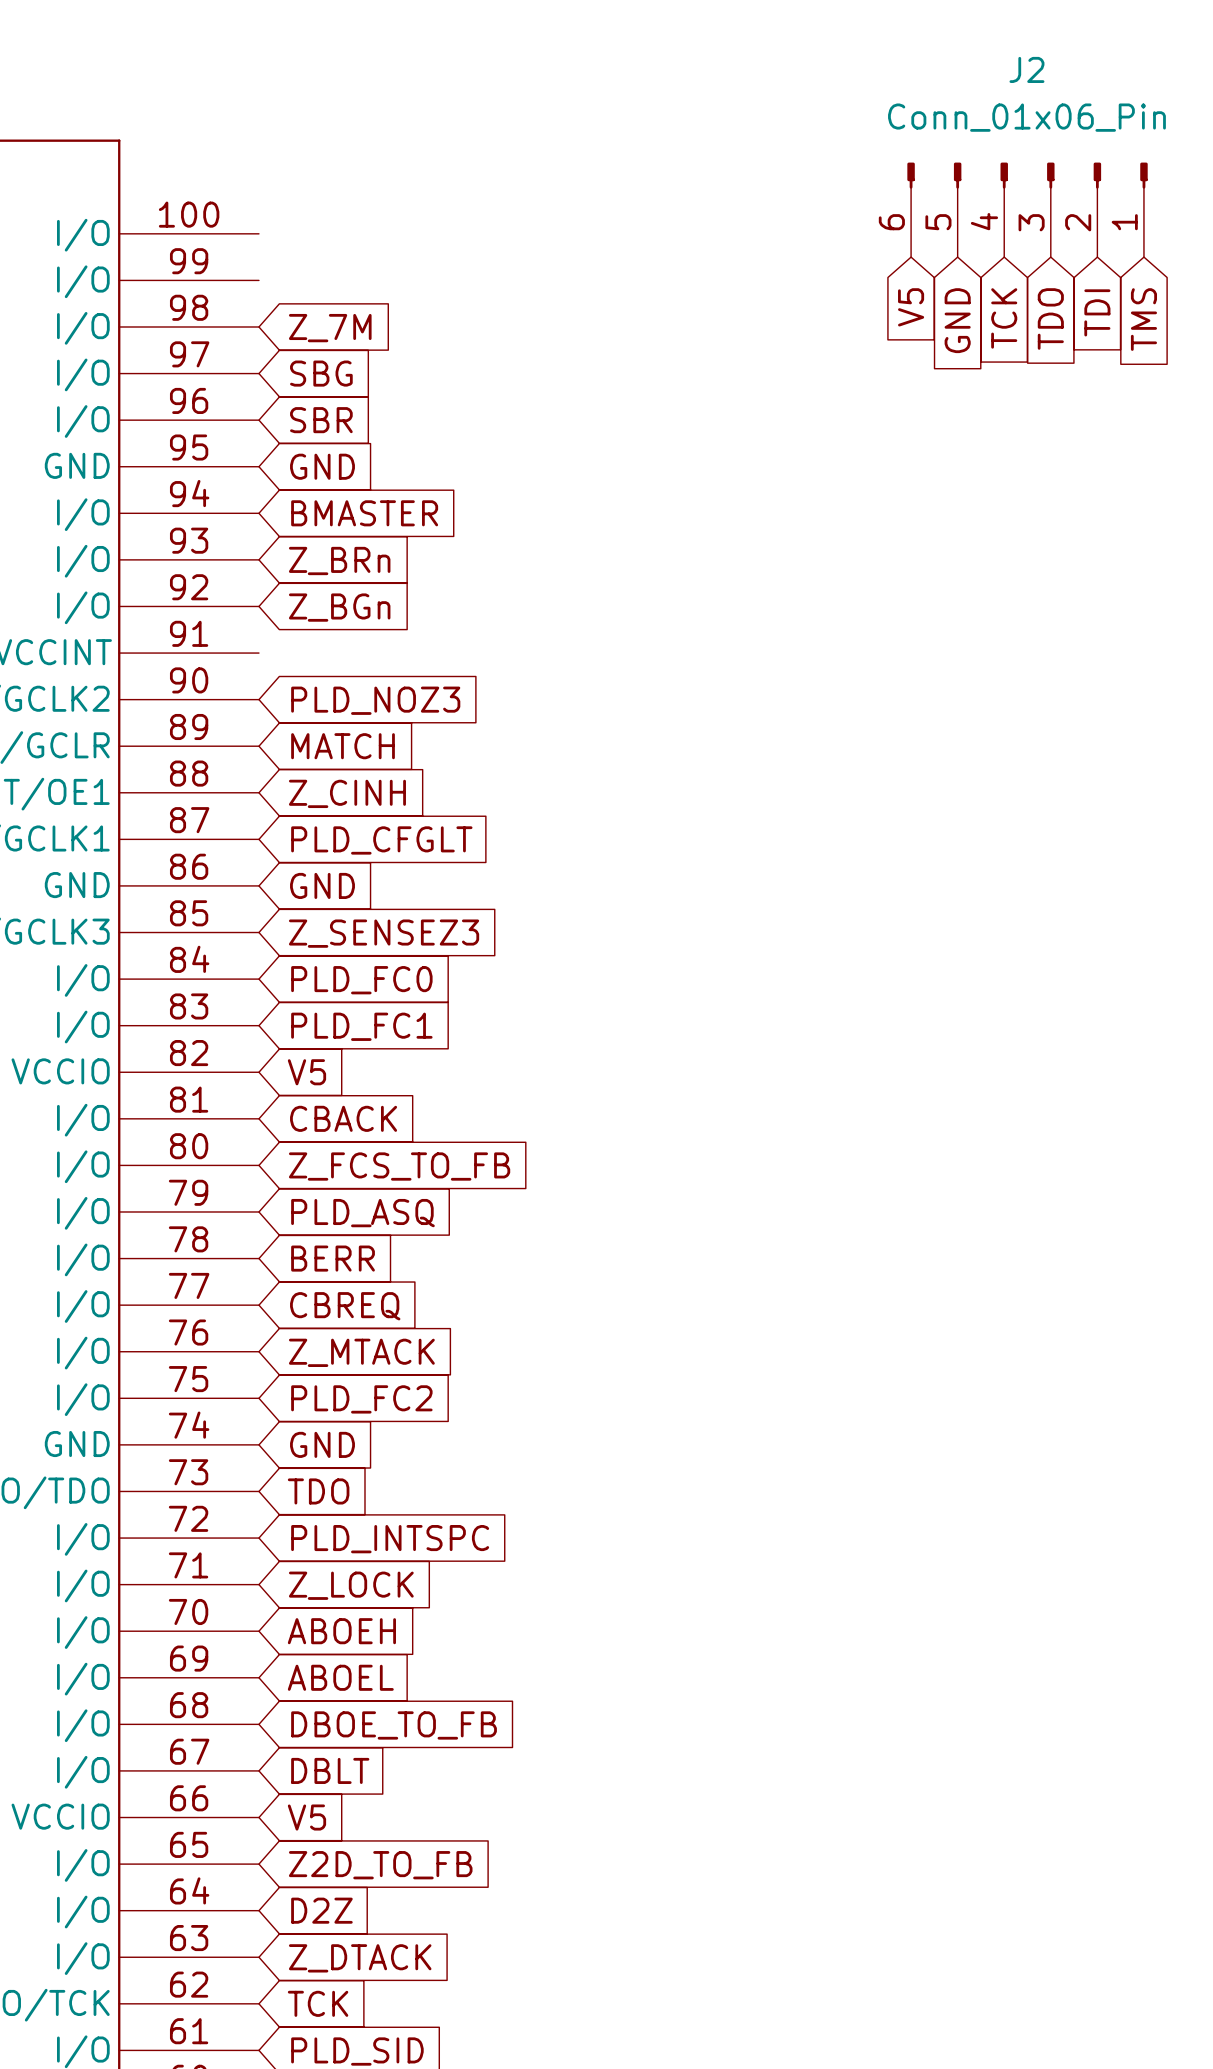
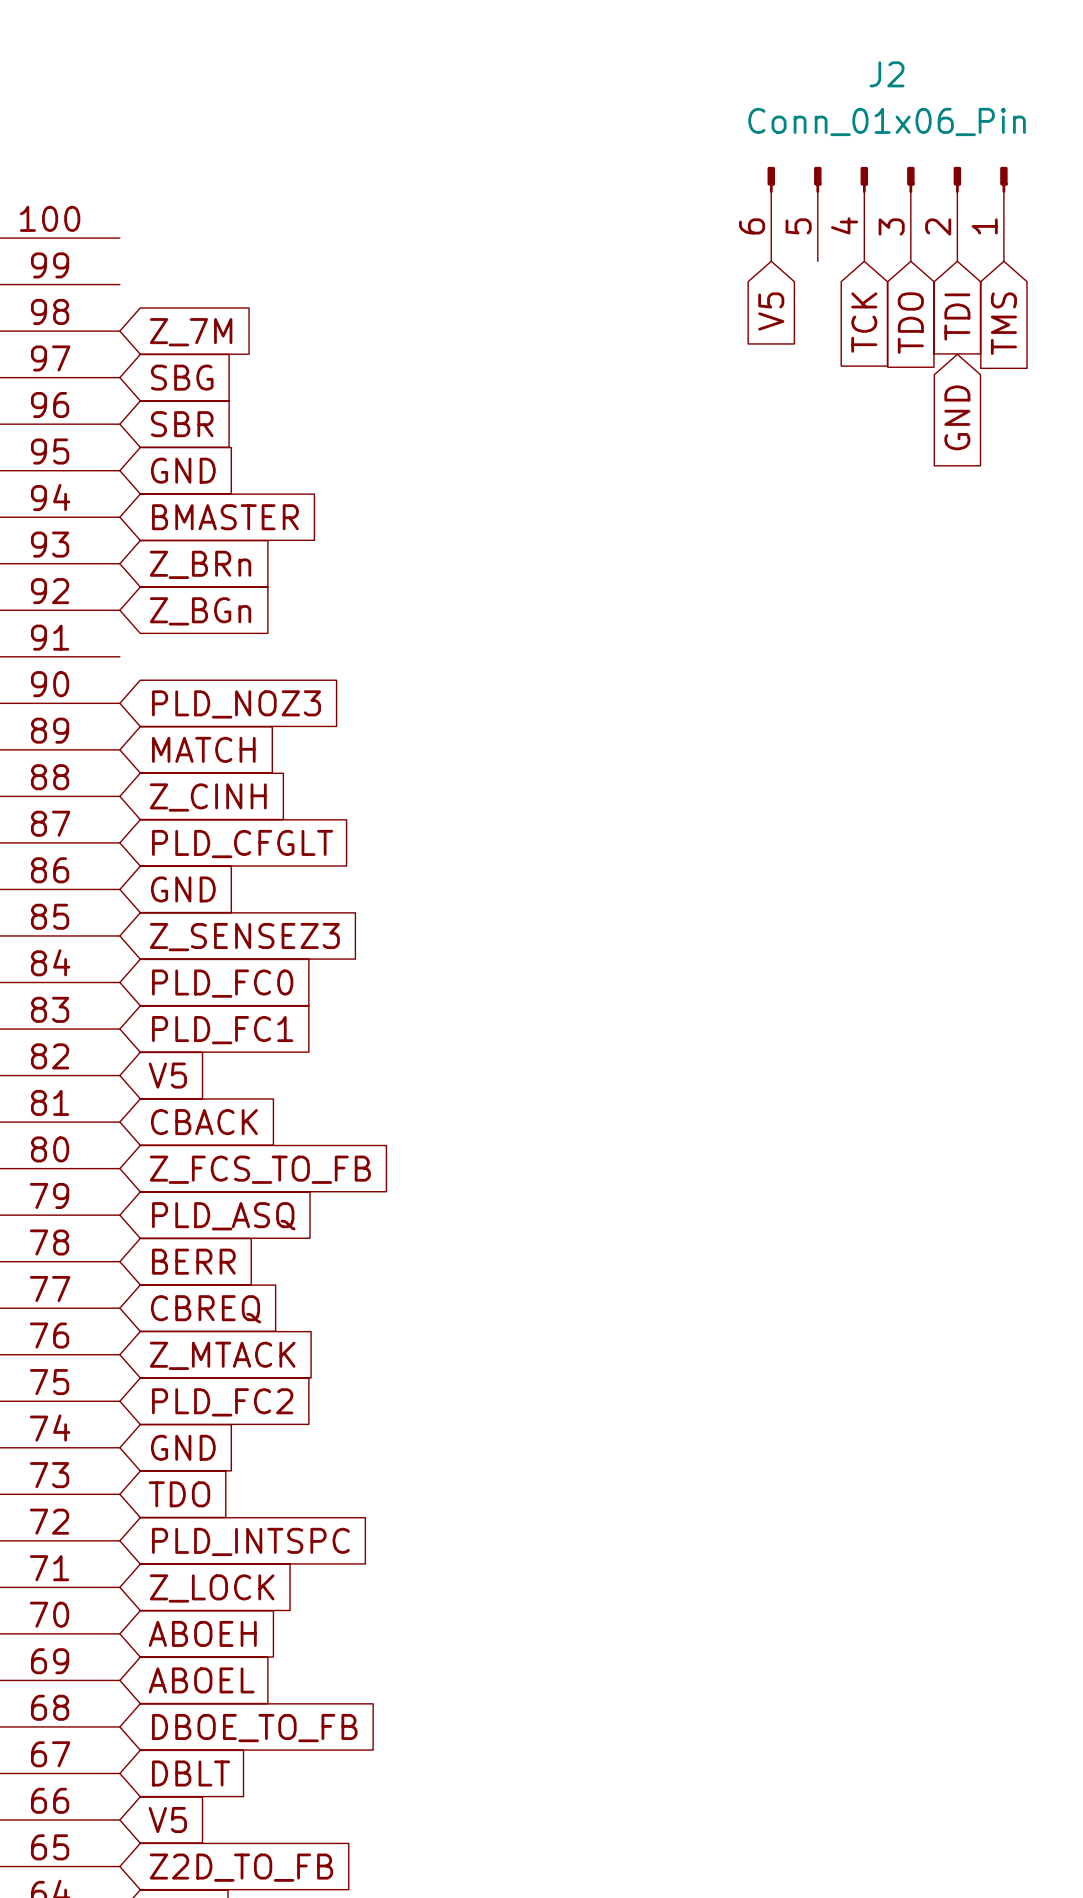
global label position: GND (957, 320) -> GND (957, 417)

